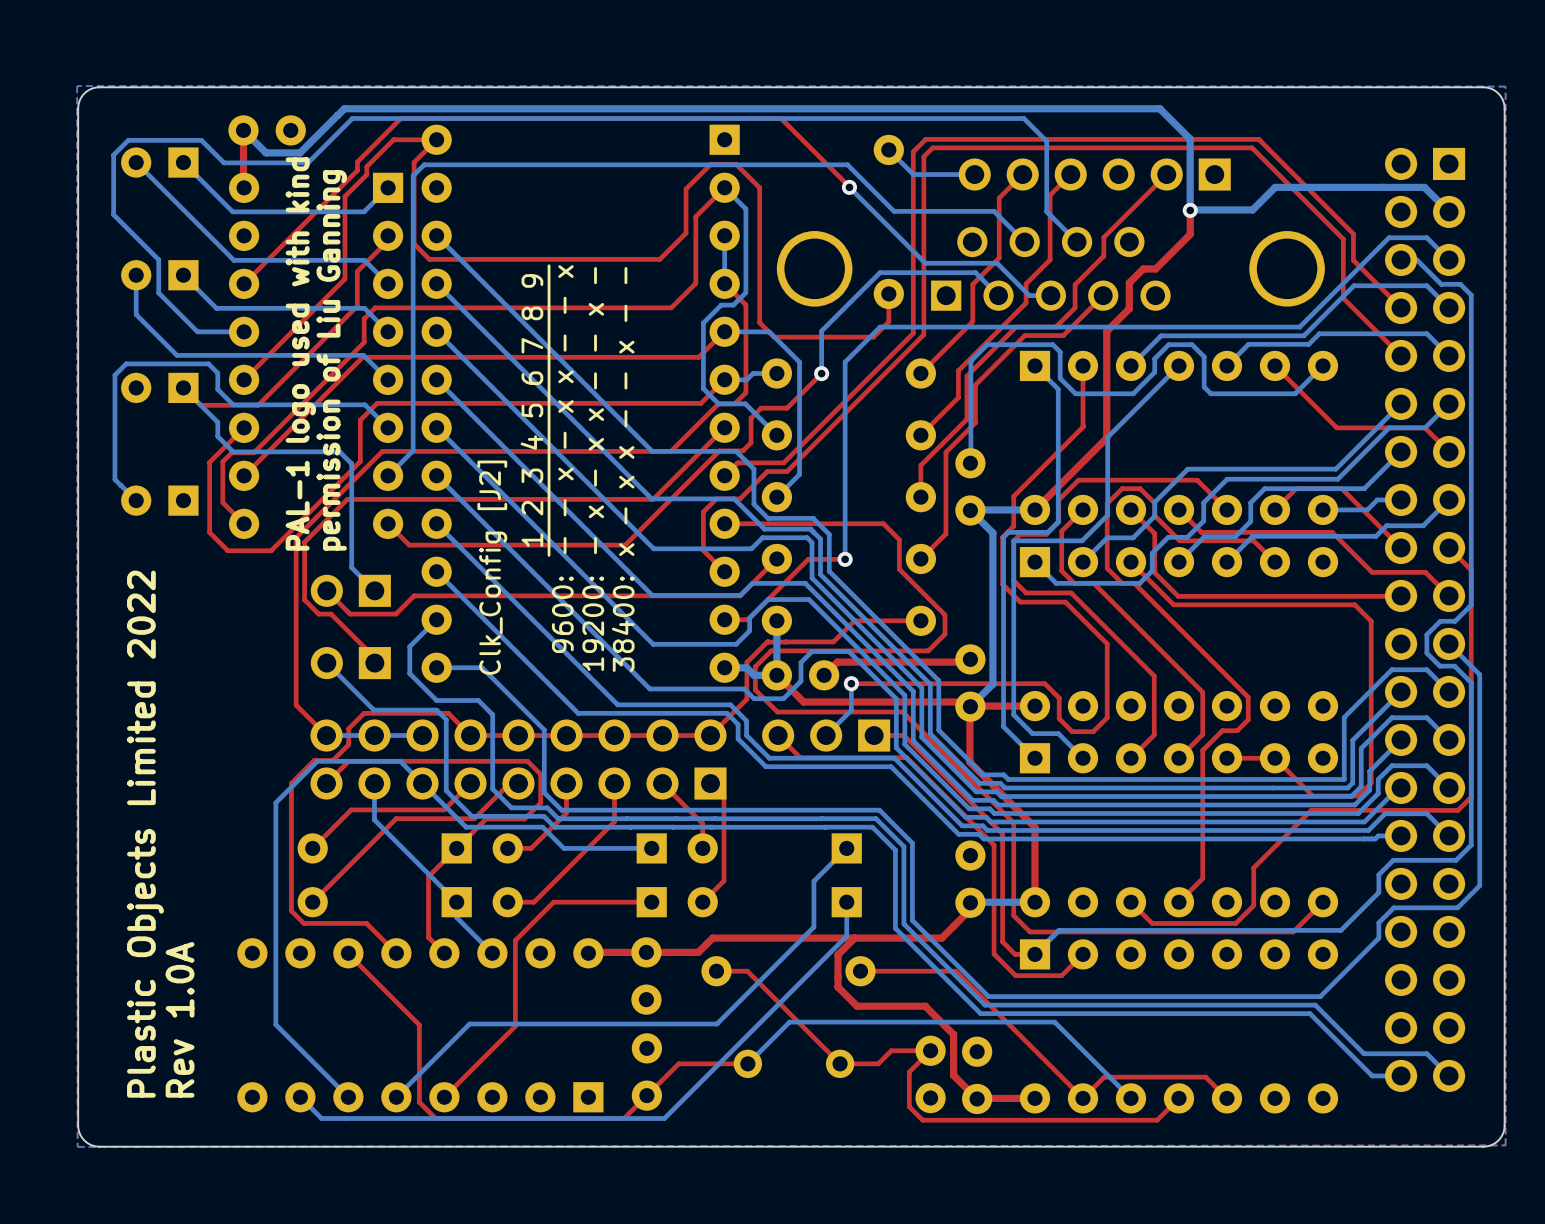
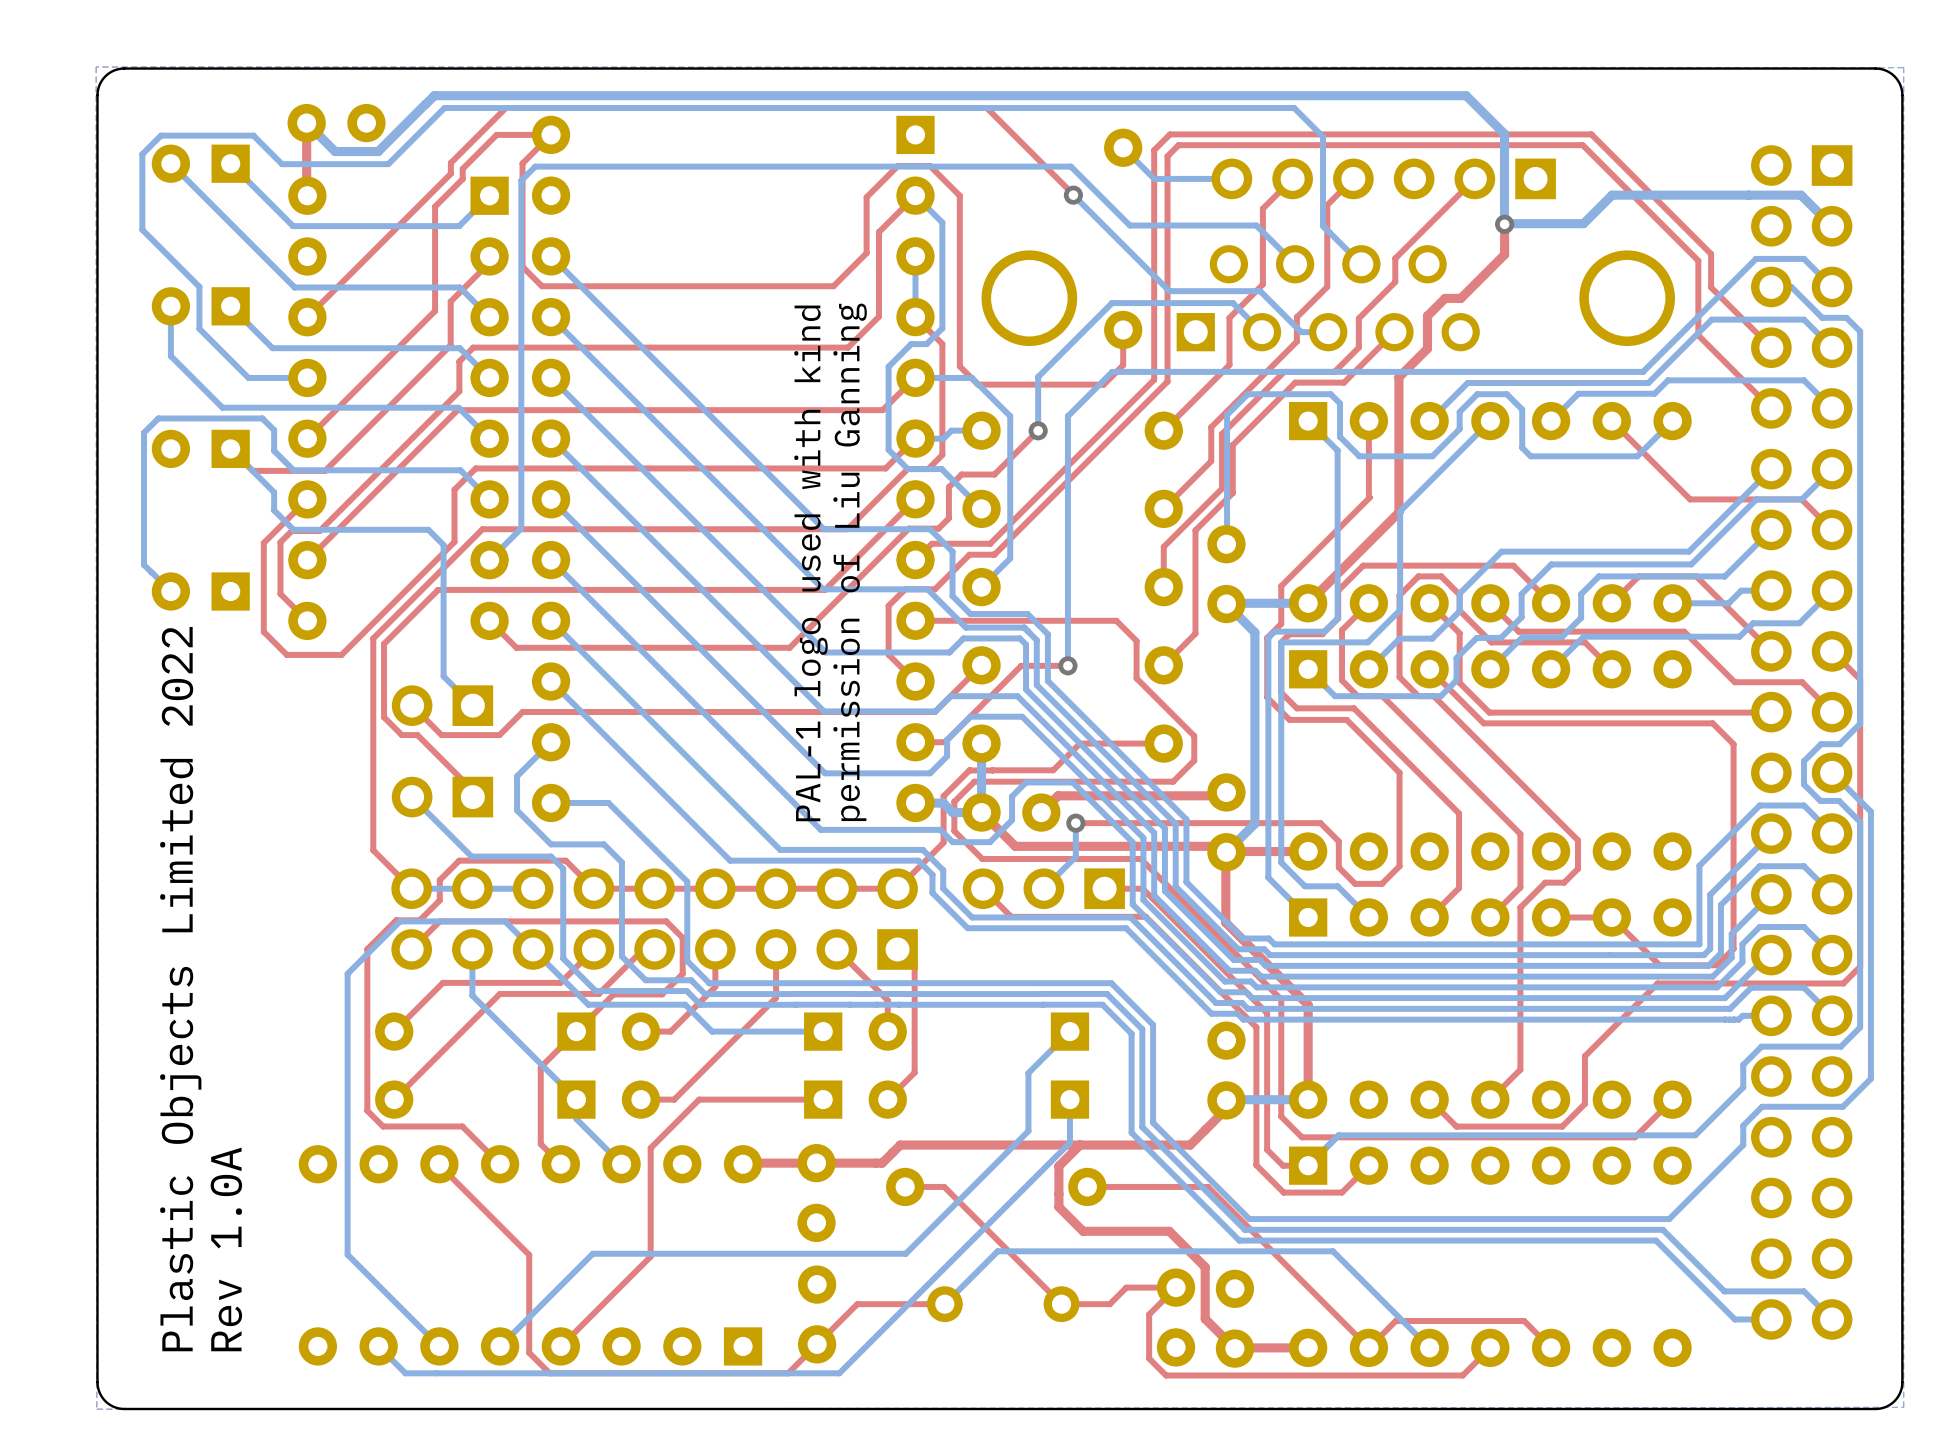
text position: PAL-1 logo used with kind (300, 354) -> PAL-1 logo used with kind (810, 563)
text position: permission of Liu Ganning (331, 360) -> permission of Liu Ganning (850, 562)
text: 1 2 3 4 5 6 7 8 9 (531, 410) -> none
text: ~{- - x - x x - - x} (560, 410) -> none
text: - x - x x - - x - (596, 410) -> none
text: x - x x - - x - - (626, 411) -> none
text: Clk_Config [J2] (492, 567) -> none
text: 9600: (562, 614) -> none
text: 19200: (593, 623) -> none
text: 38400: (623, 624) -> none

